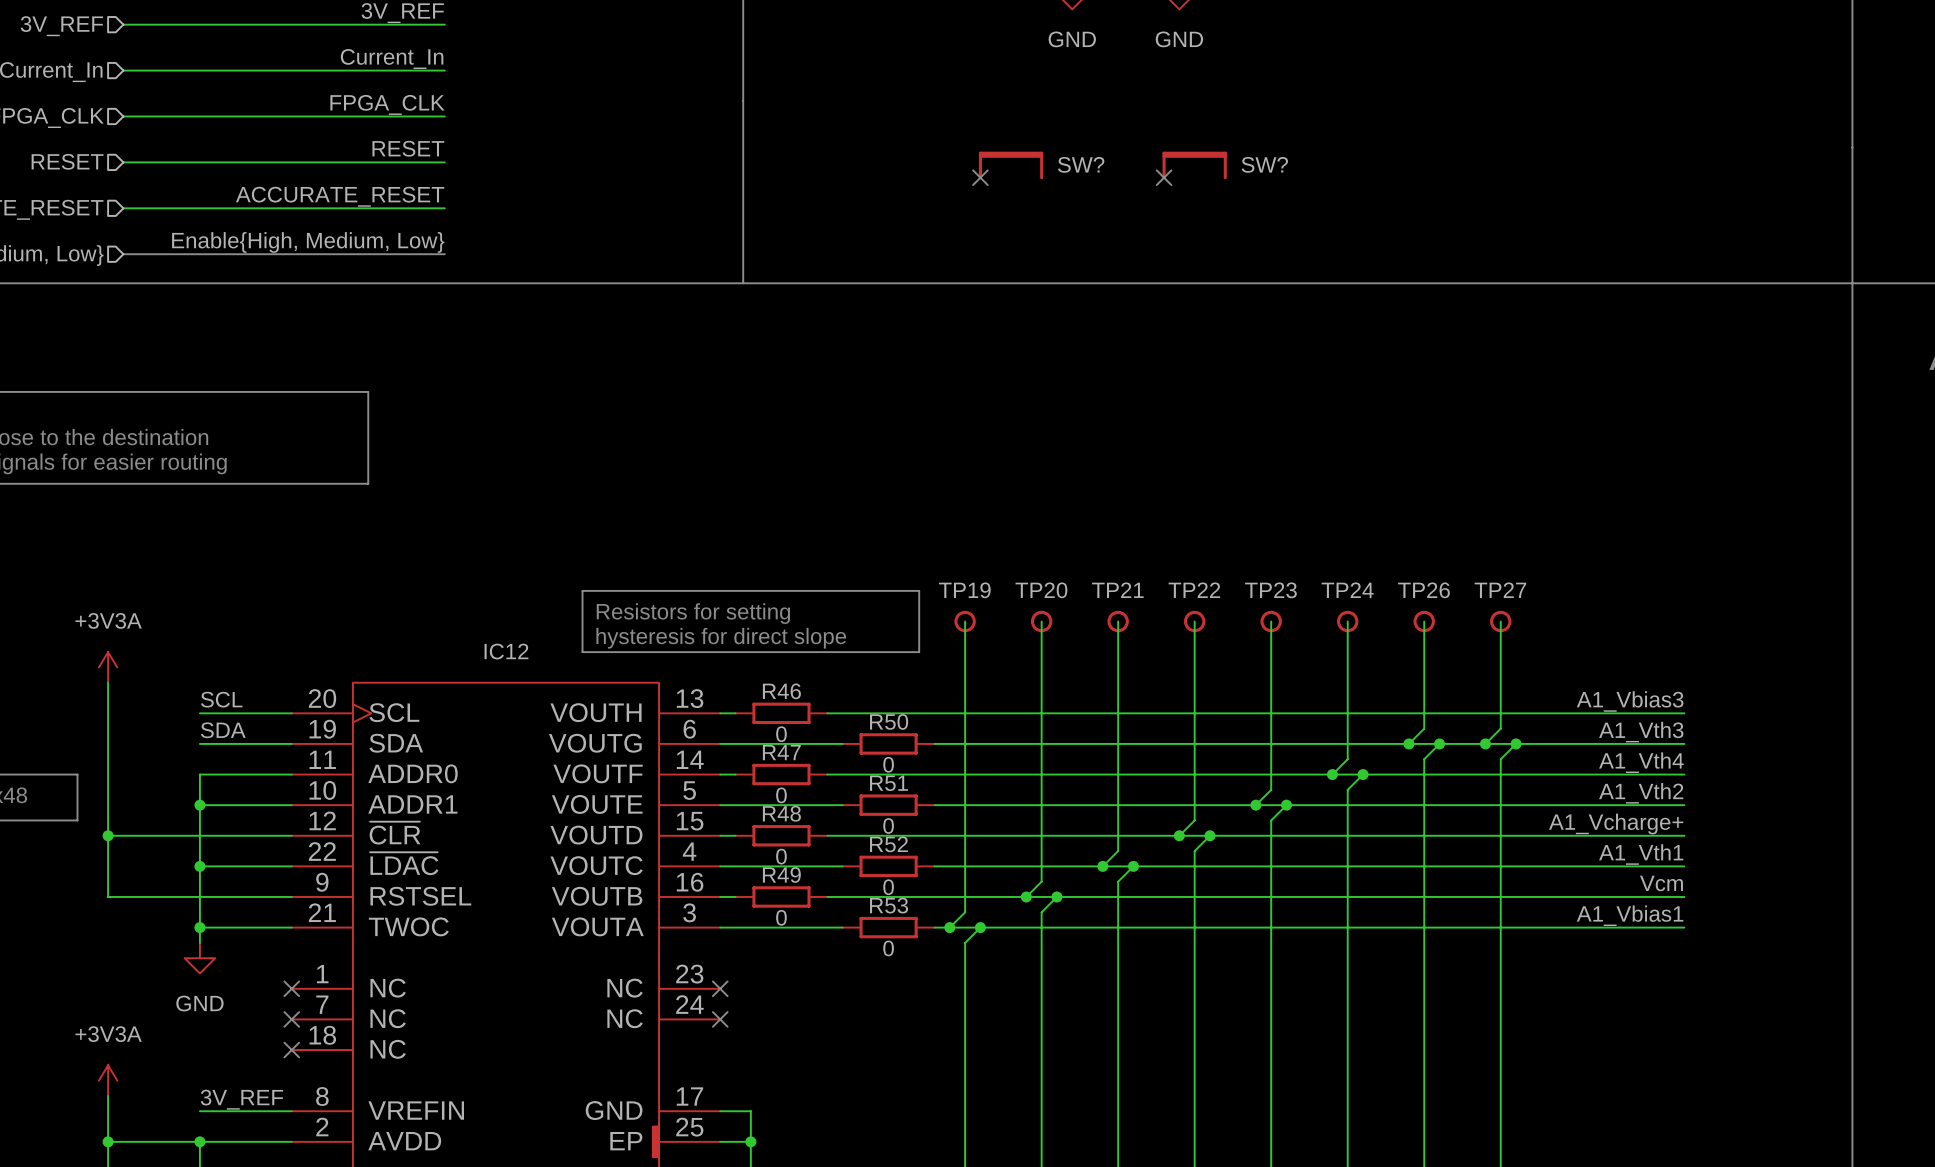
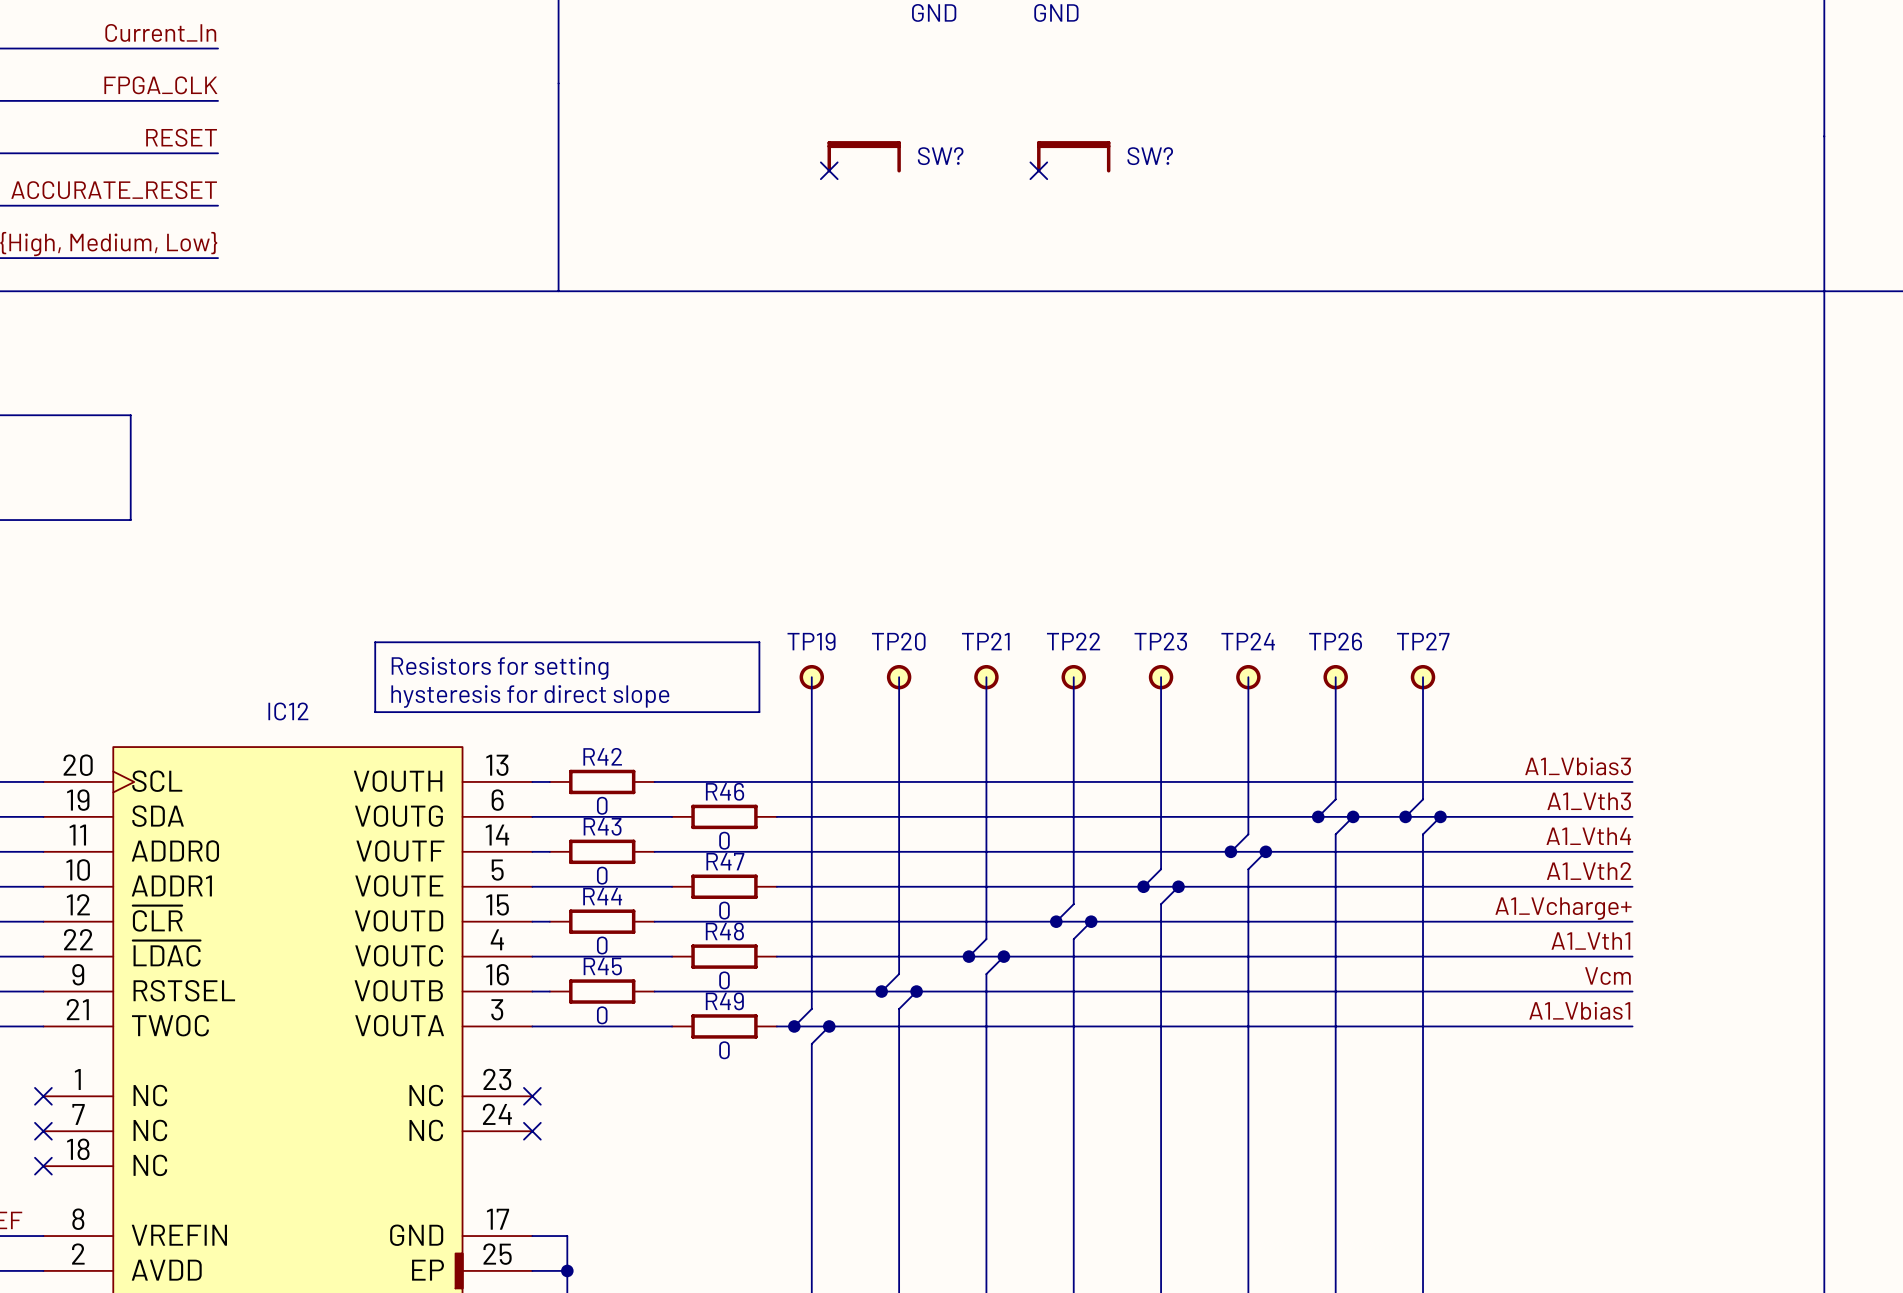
R46 name: R46 (781, 691) -> R42 (602, 756)
R50 name: R50 (889, 721) -> R46 (725, 791)
R47 name: R47 (781, 752) -> R43 (602, 826)
R51 name: R51 (888, 783) -> R47 (725, 861)
R48 name: R48 (781, 813) -> R44 (602, 896)
R52 name: R52 (888, 844) -> R48 (724, 931)
R49 name: R49 (781, 874) -> R45 (602, 966)
R53 name: R53 (889, 905) -> R49 (724, 1001)

